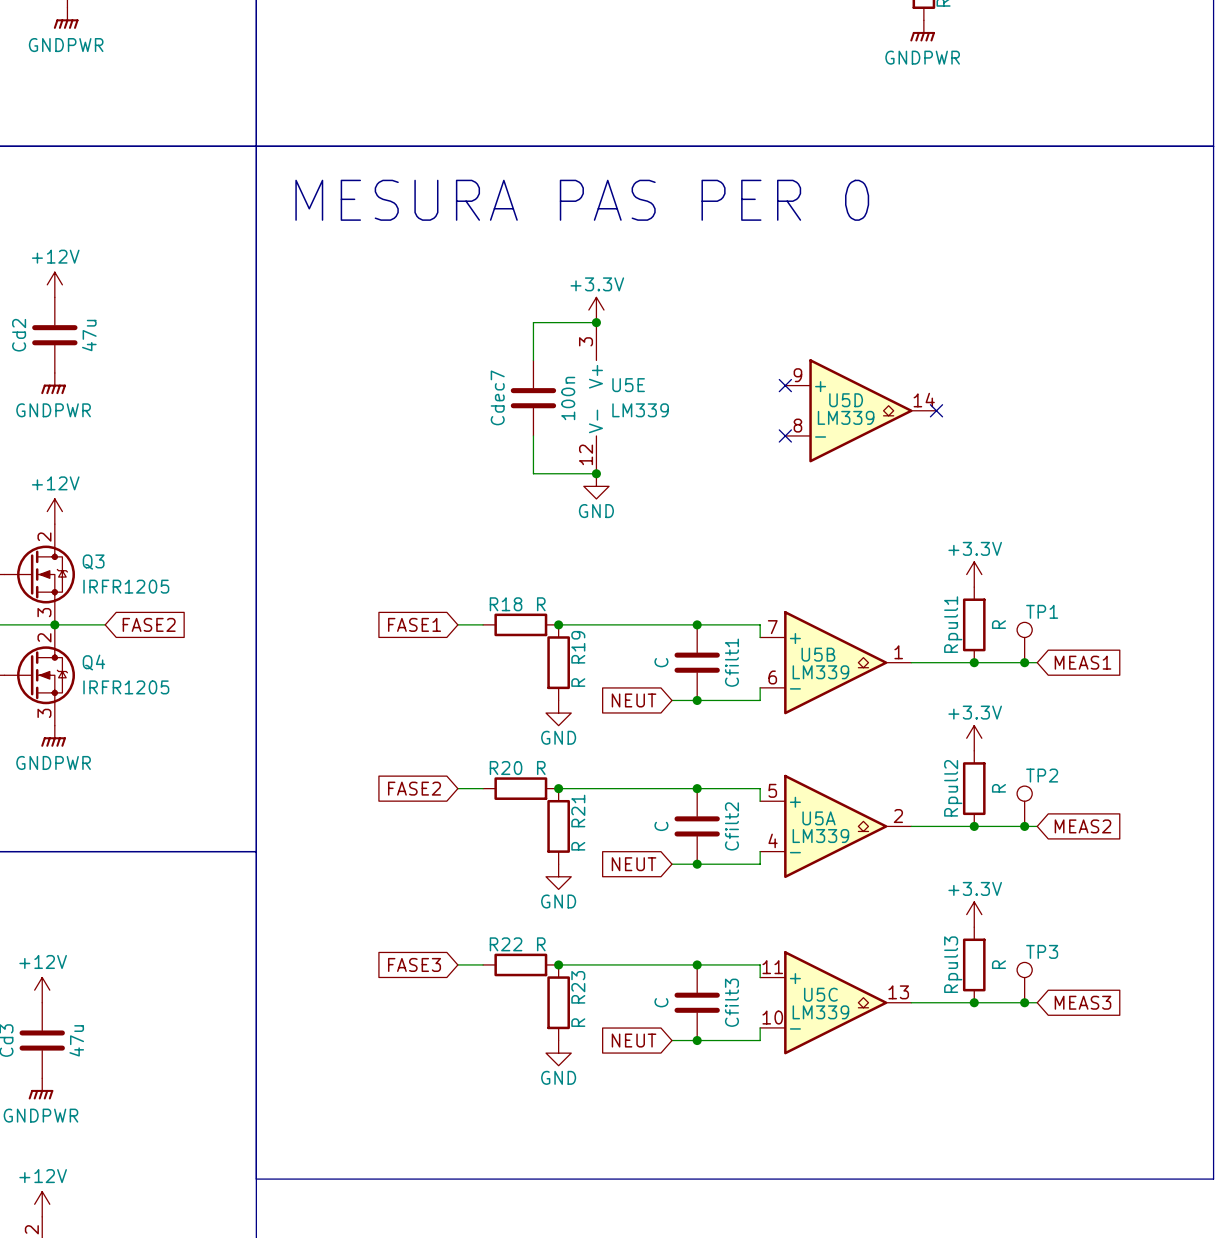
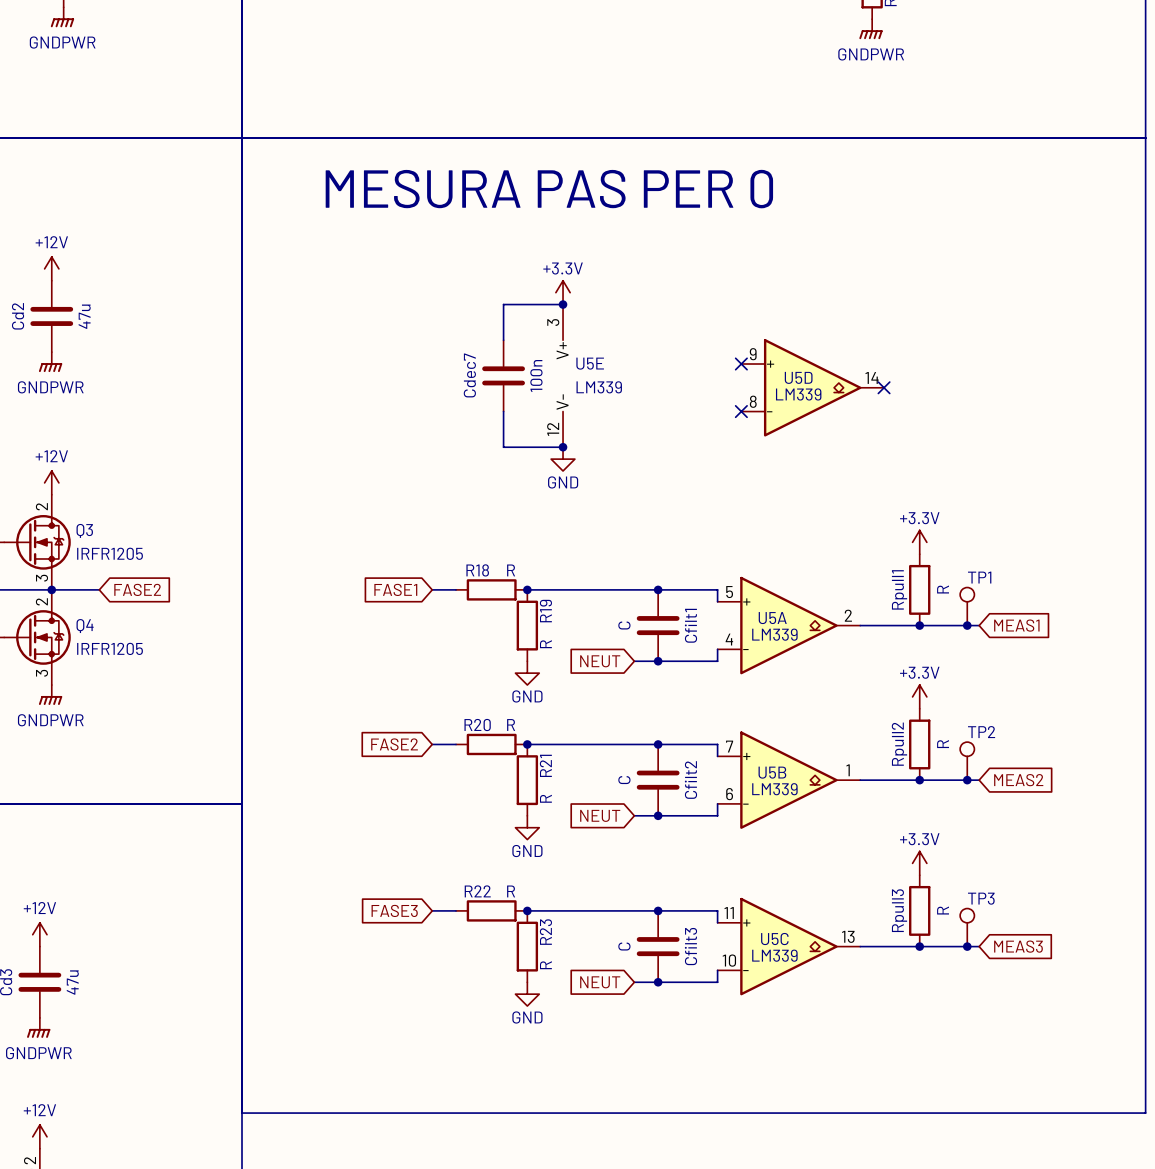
U5B position: (835, 662) -> (788, 780)
U5A position: (835, 826) -> (788, 625)

